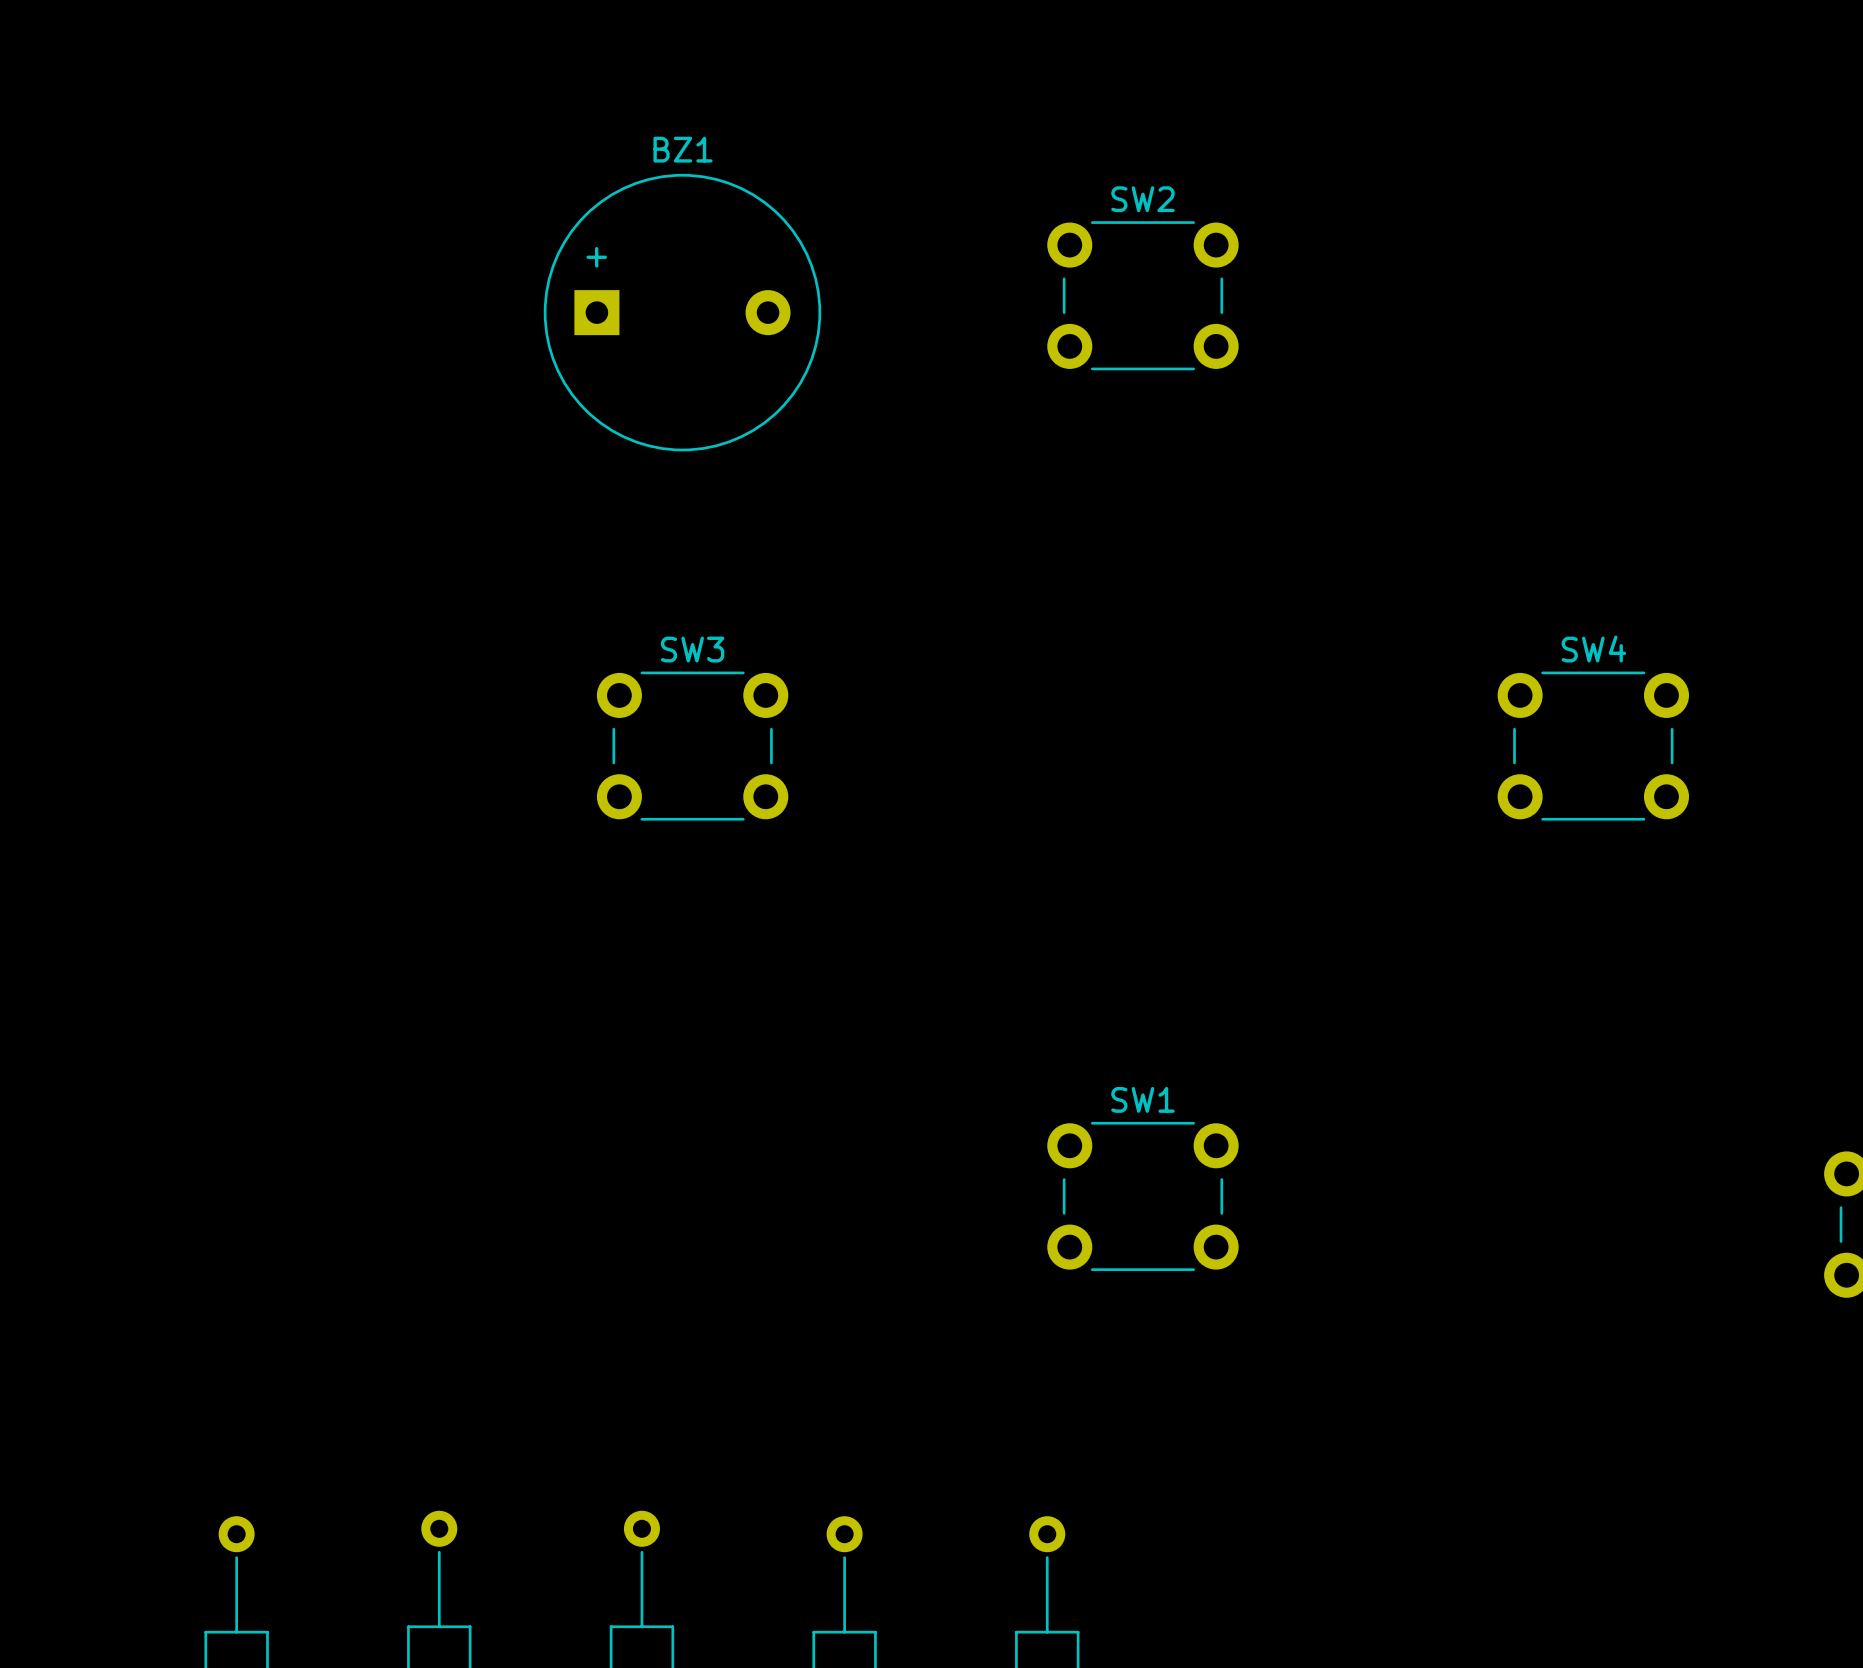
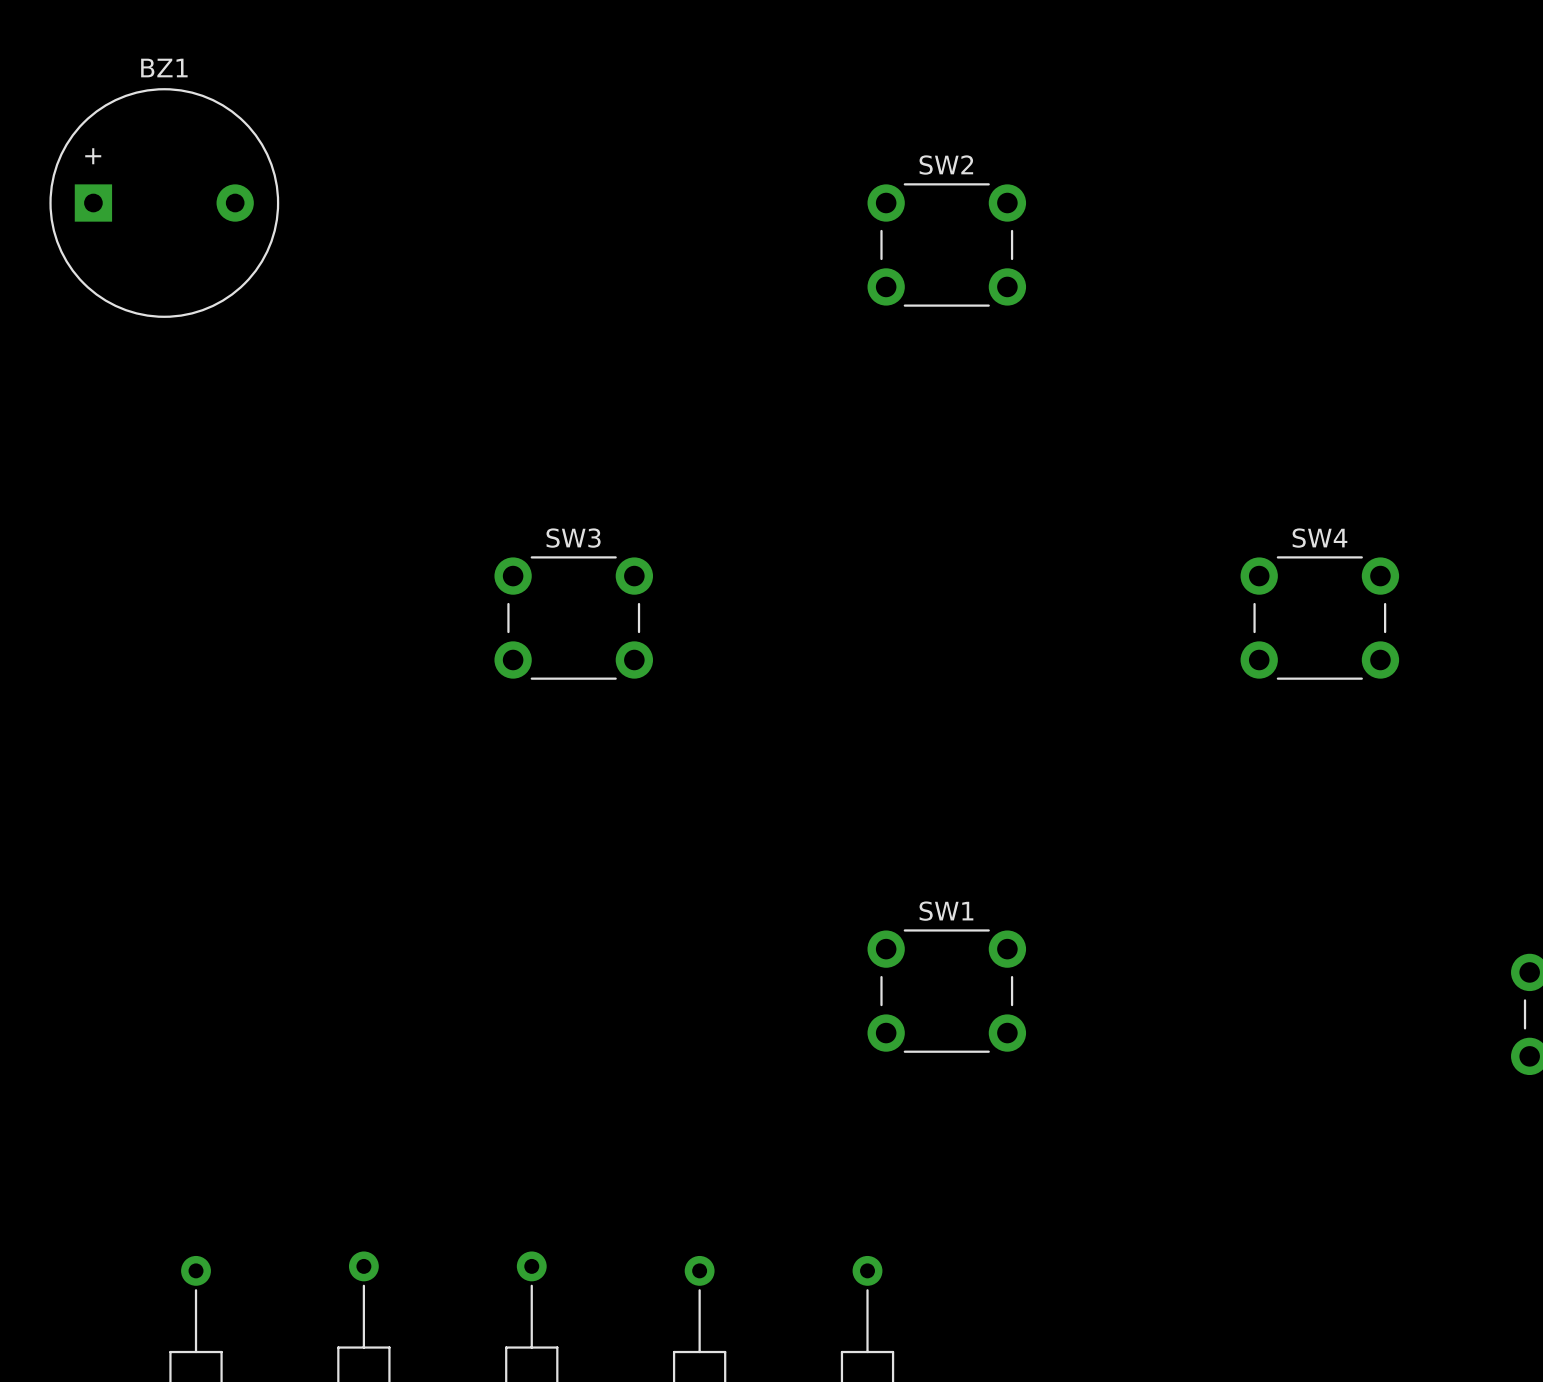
BZ1 position: (682, 312) -> (164, 203)

